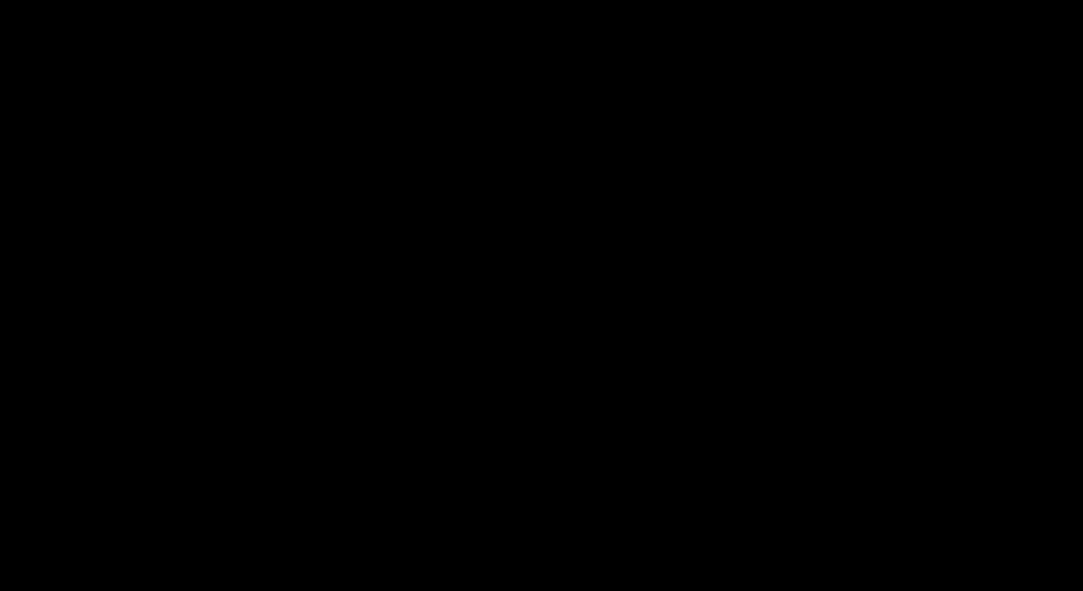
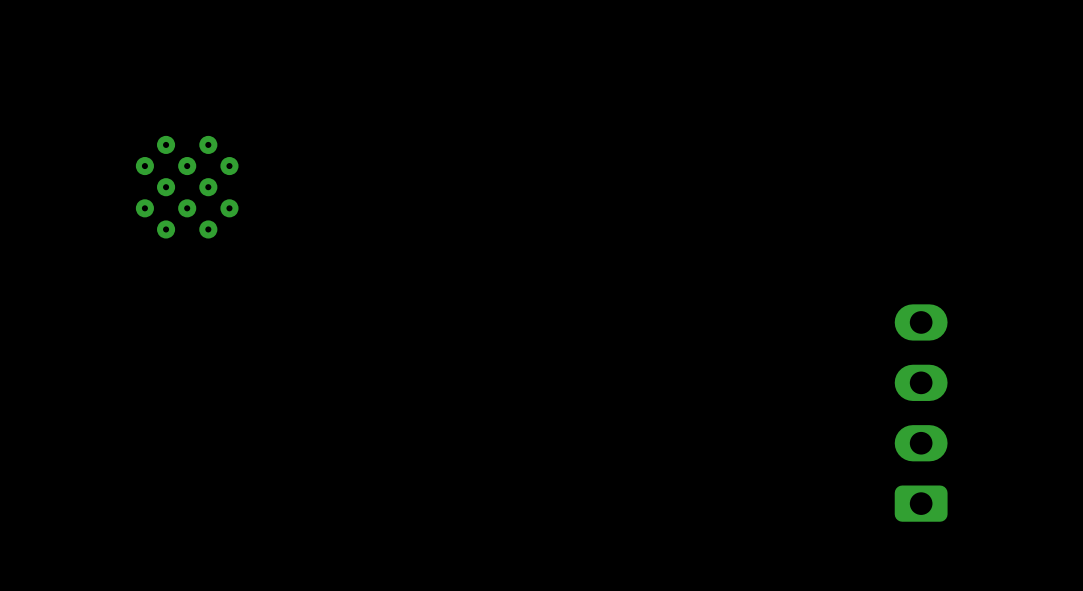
part: none -> (187, 187)
part: none -> (921, 413)

